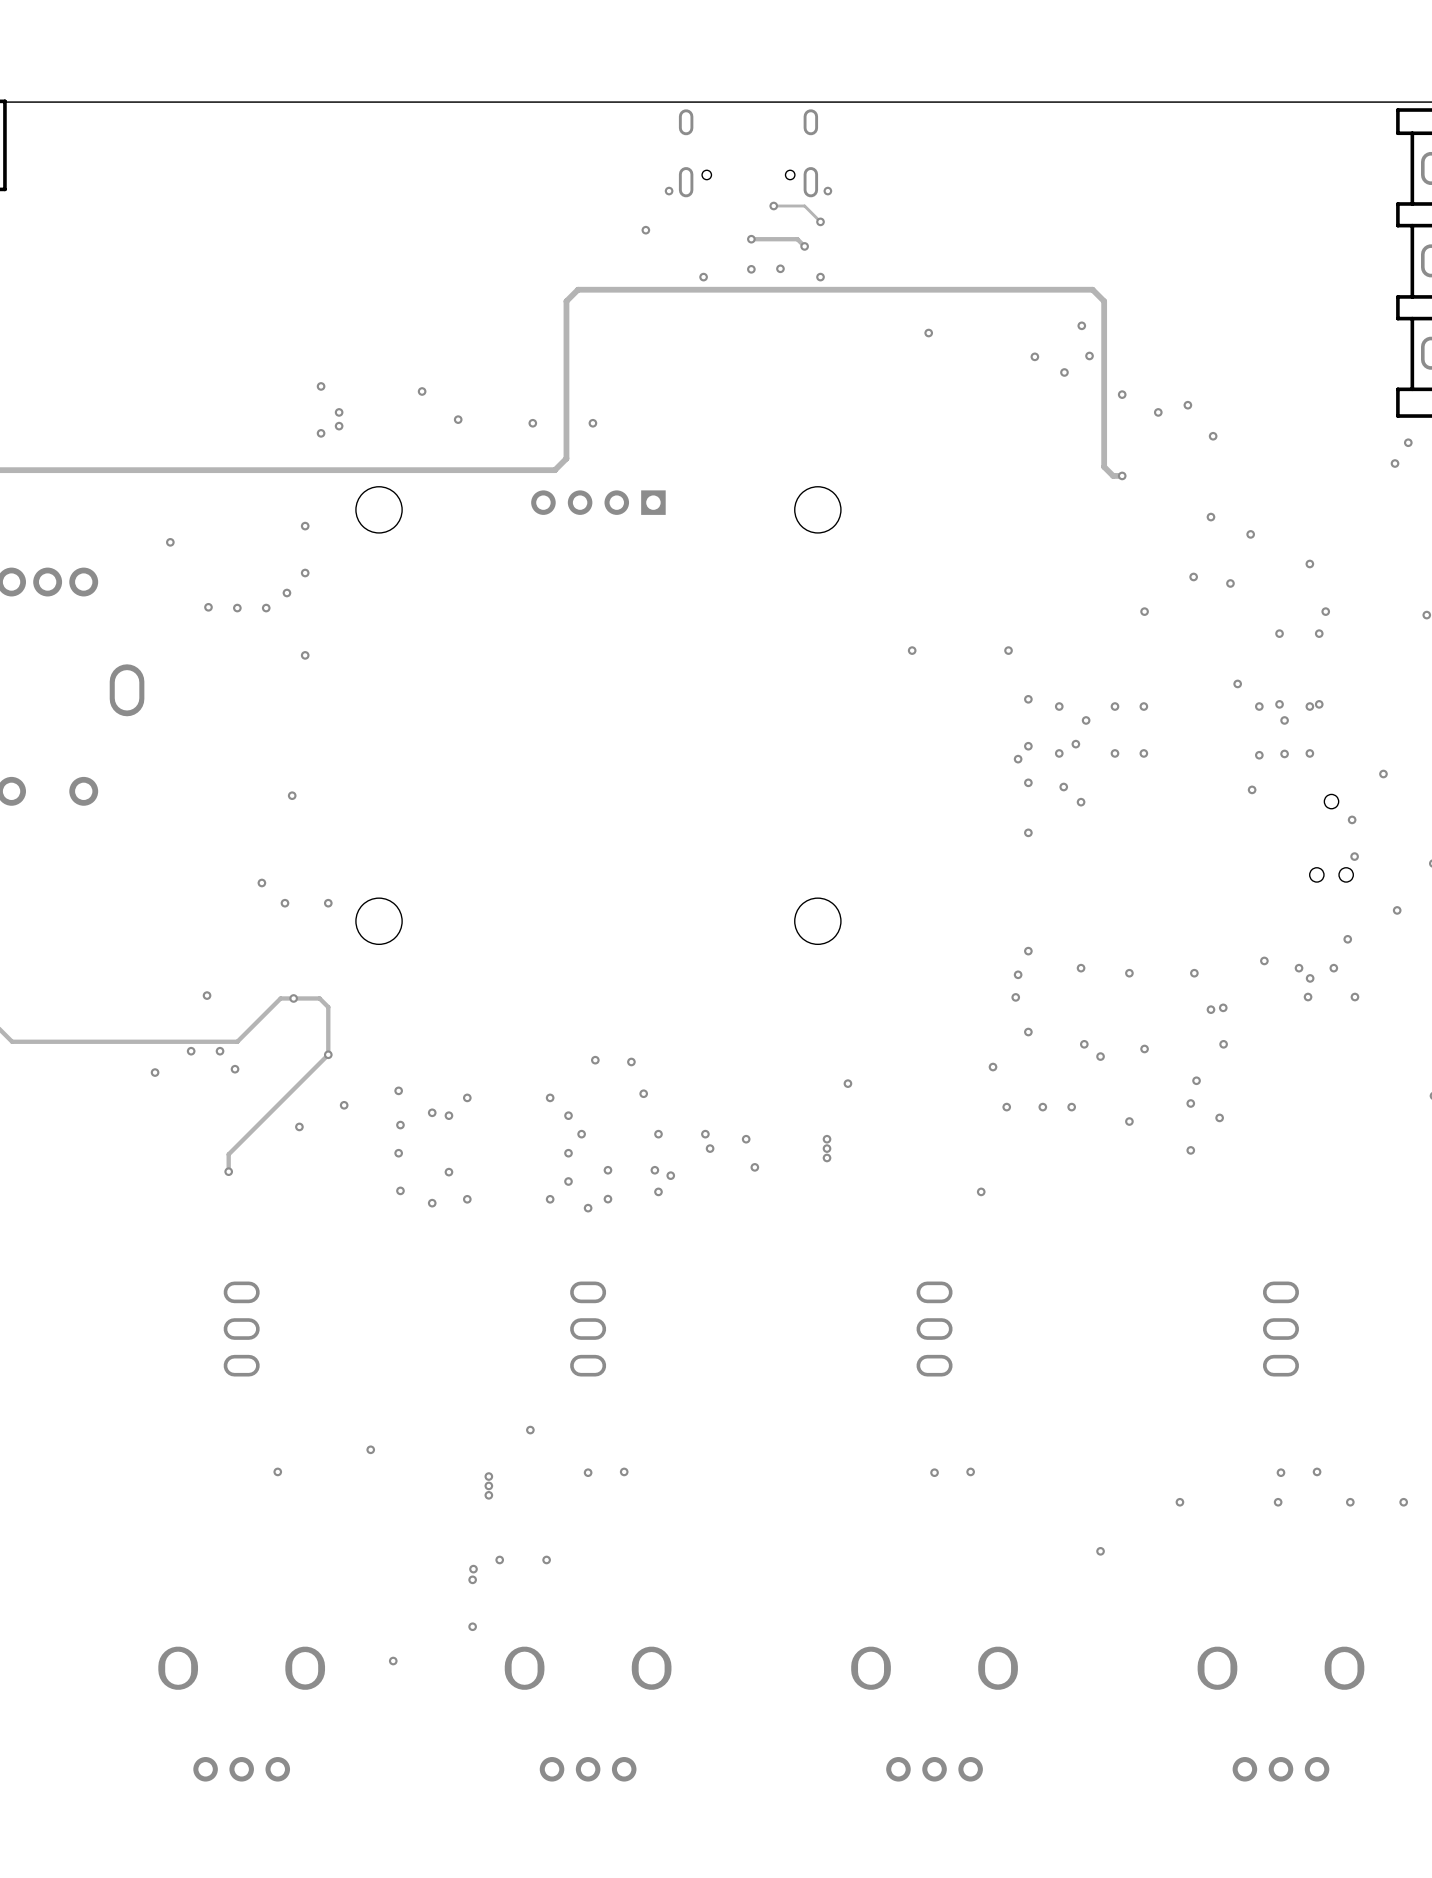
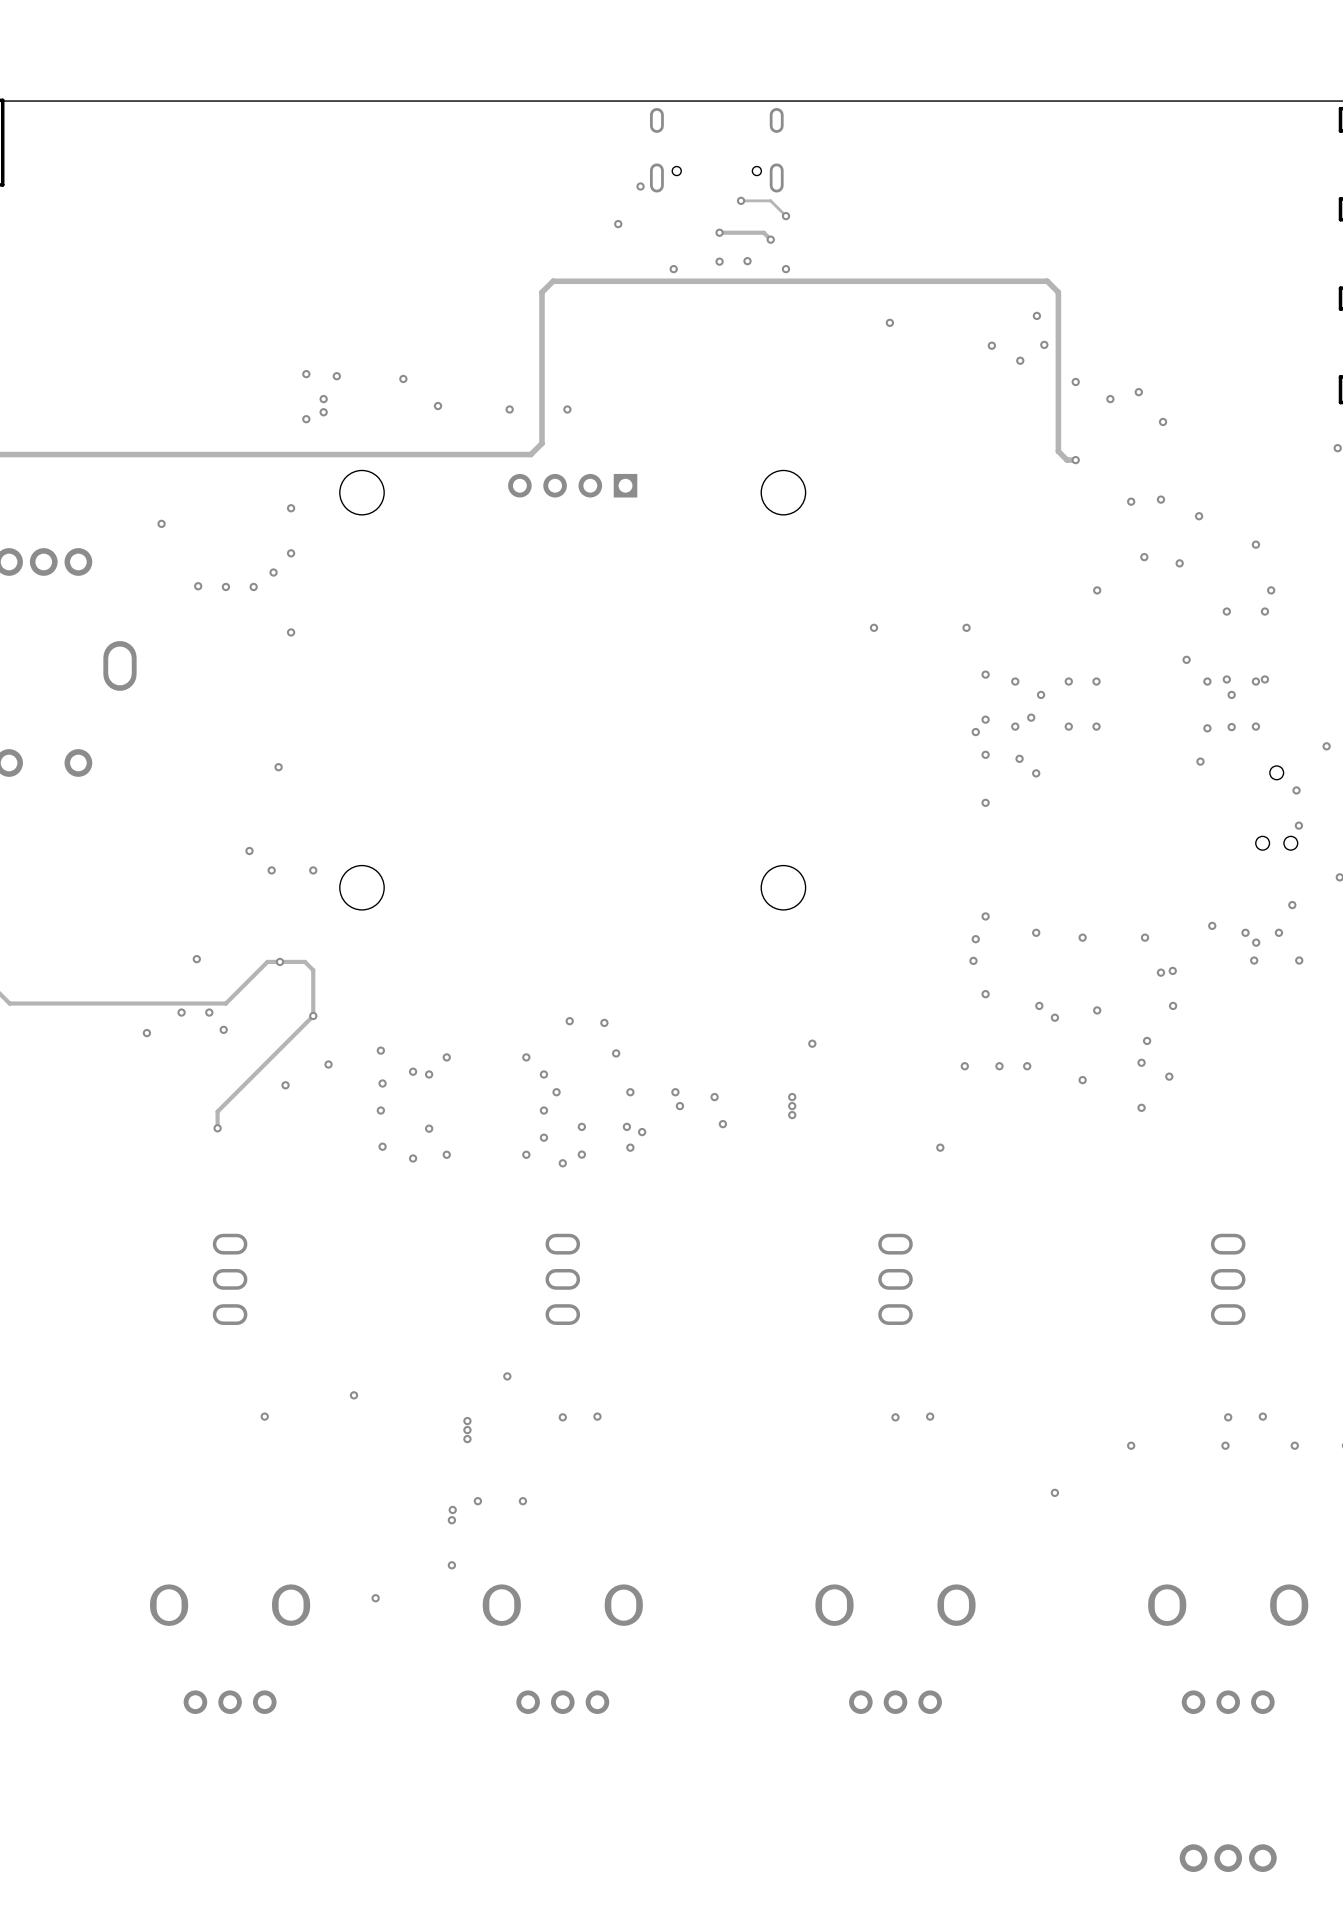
via: (827, 191) -> none
via: none -> (336, 376)
via: none -> (1131, 501)
via: (993, 1067) -> none

